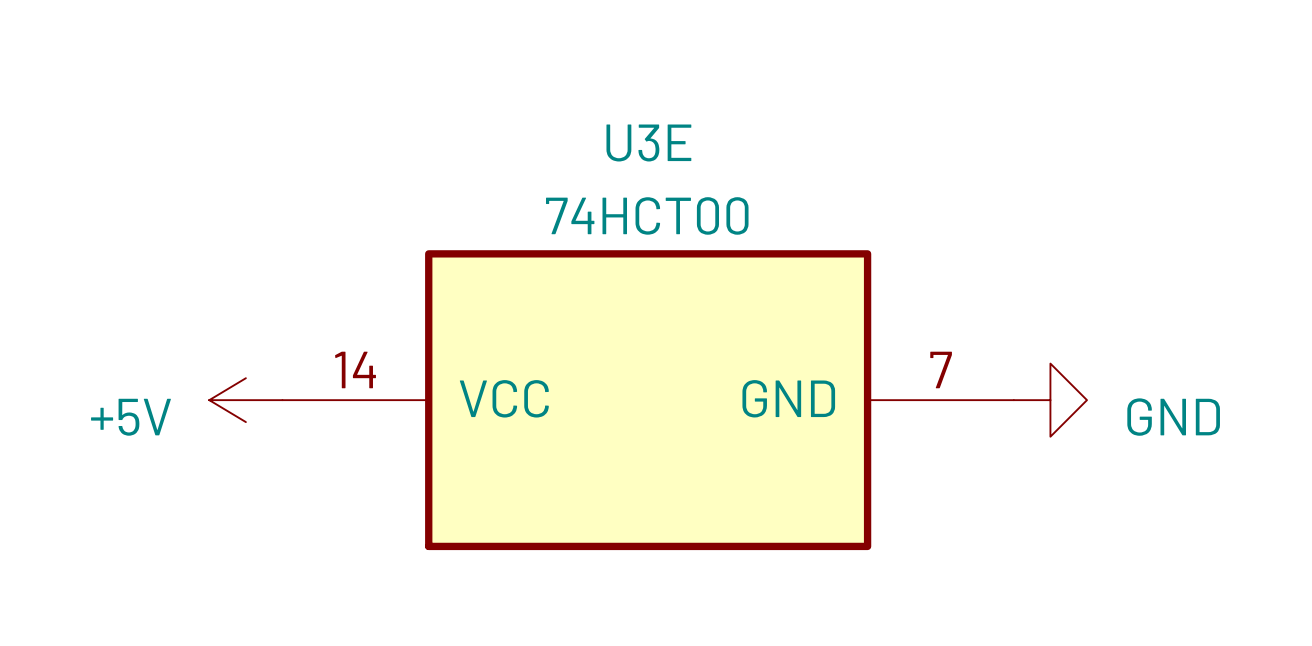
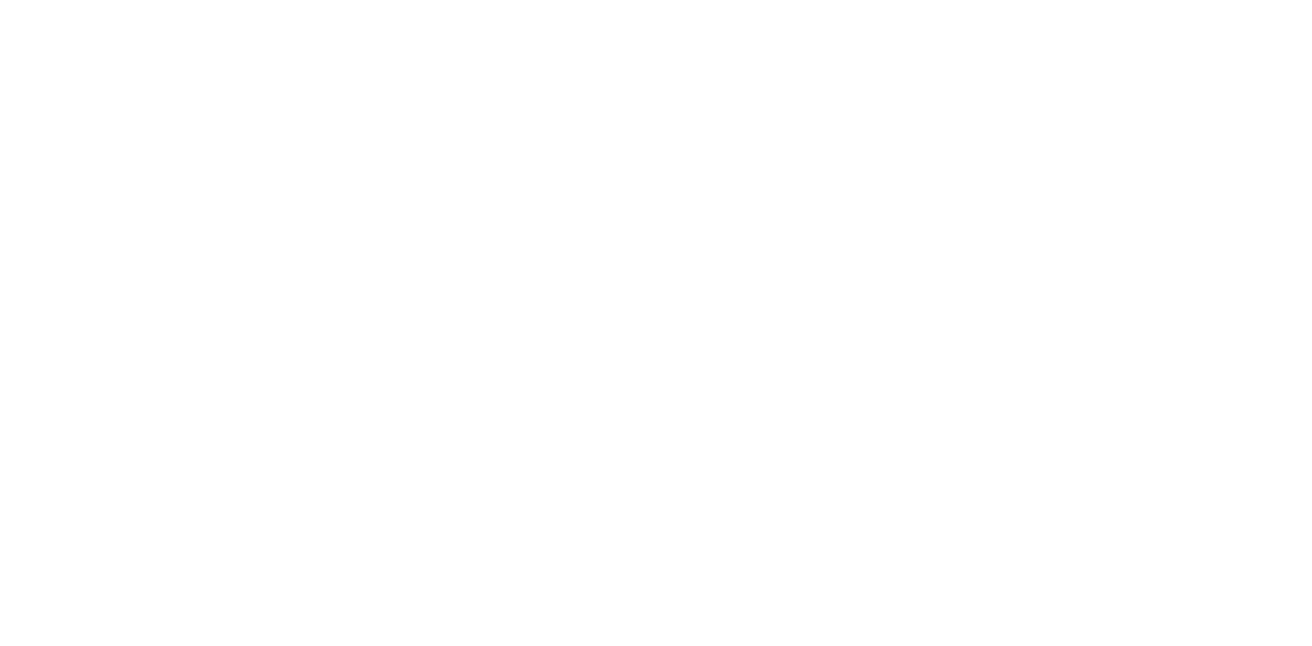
power symbol: +5V (245, 400) -> none
U3E: 74HCT00 (648, 400) -> none
power symbol: GND (1050, 400) -> none

